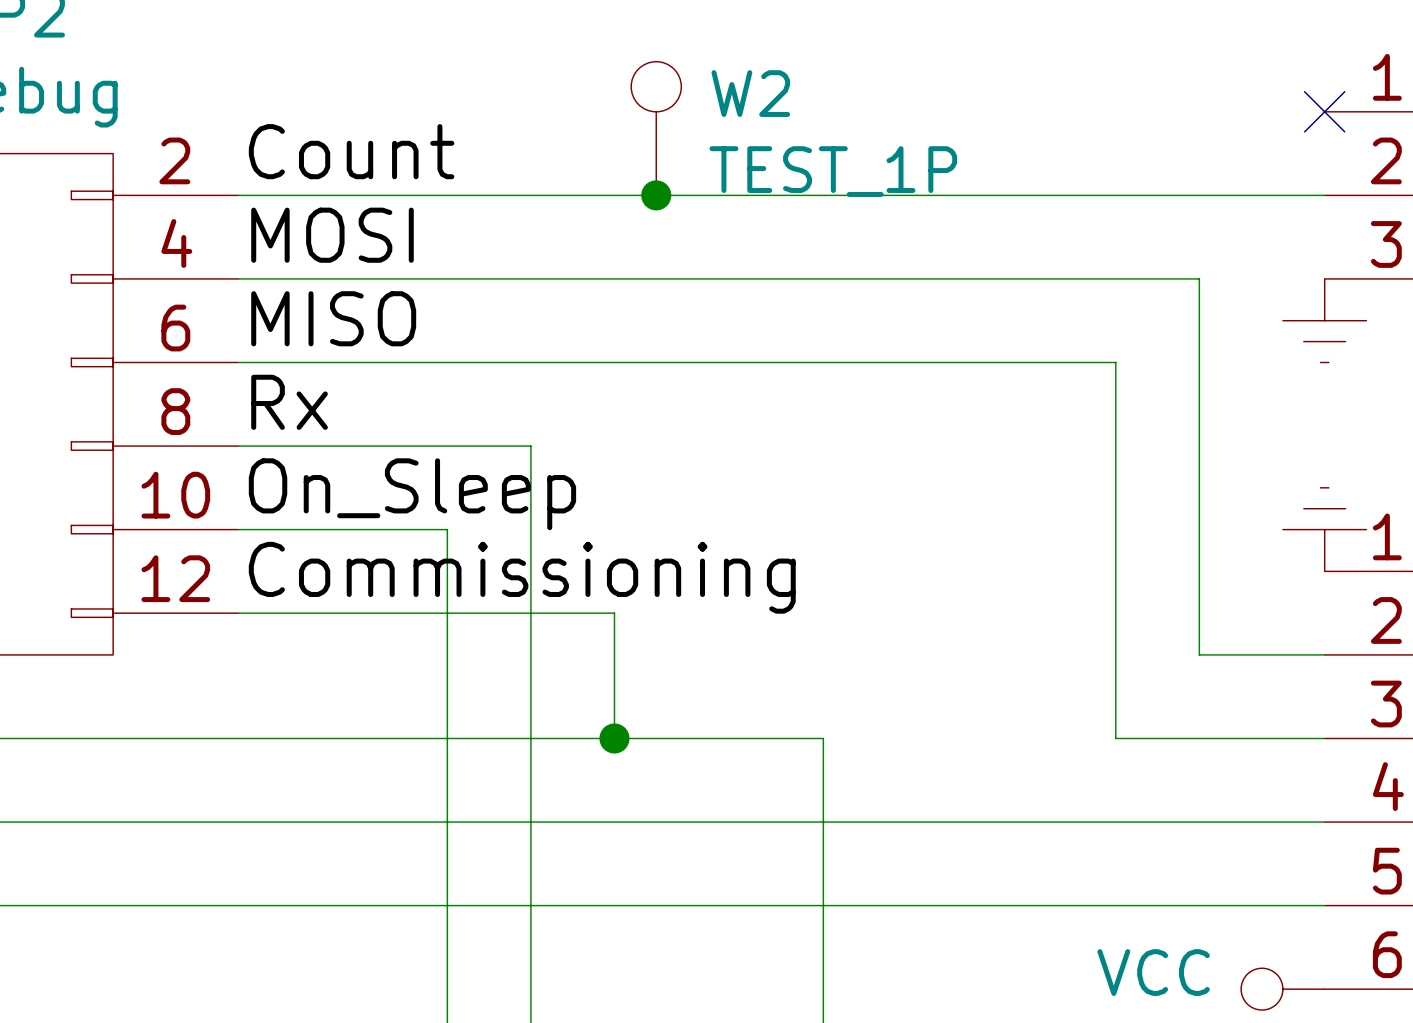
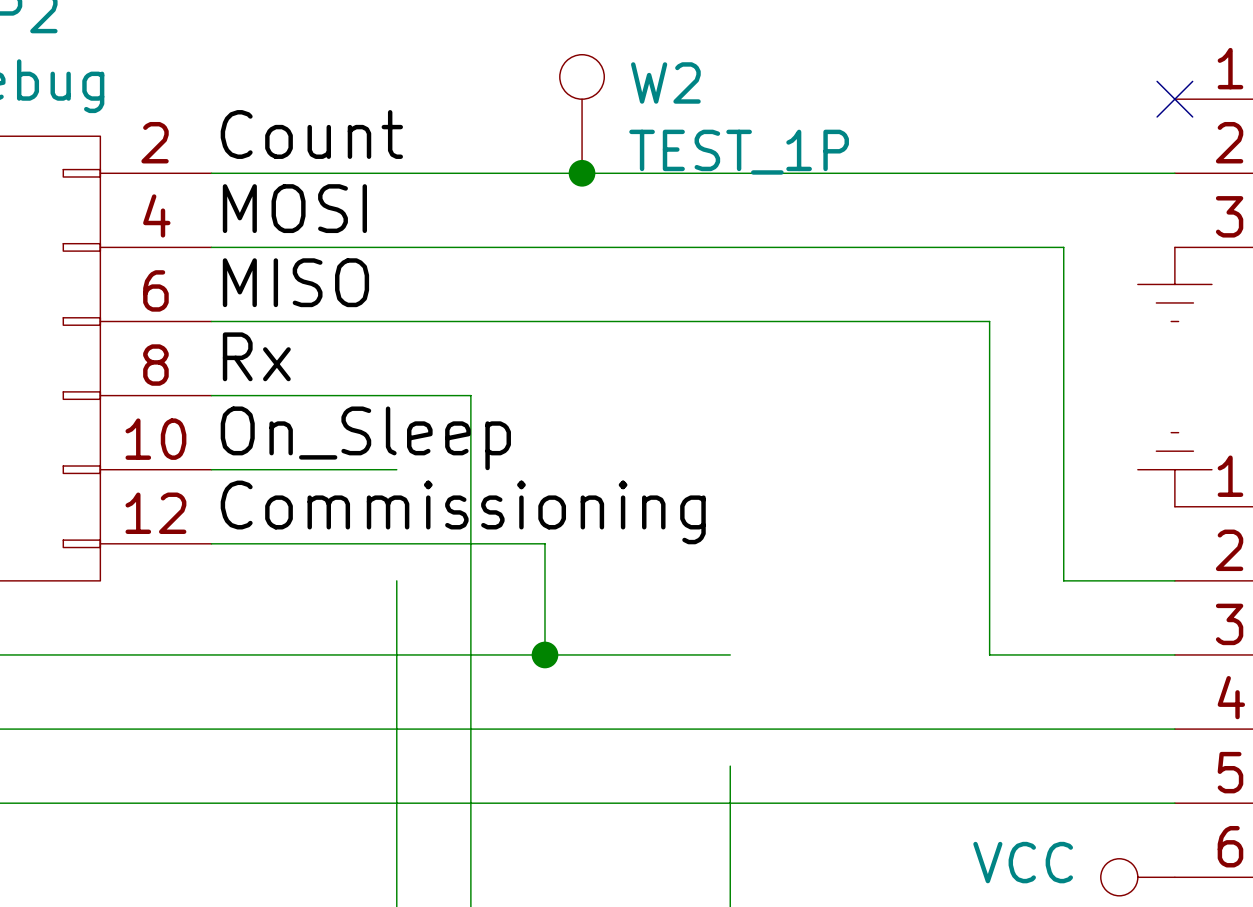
wire: (447, 529) (447, 654) -> none
wire: (823, 738) (823, 863) -> none

